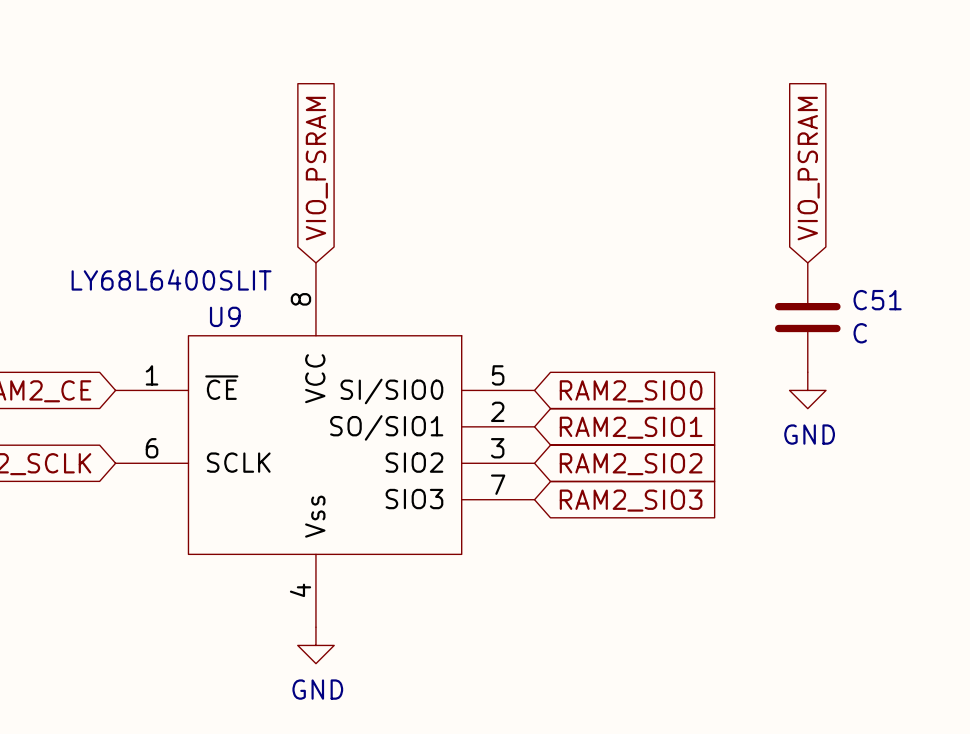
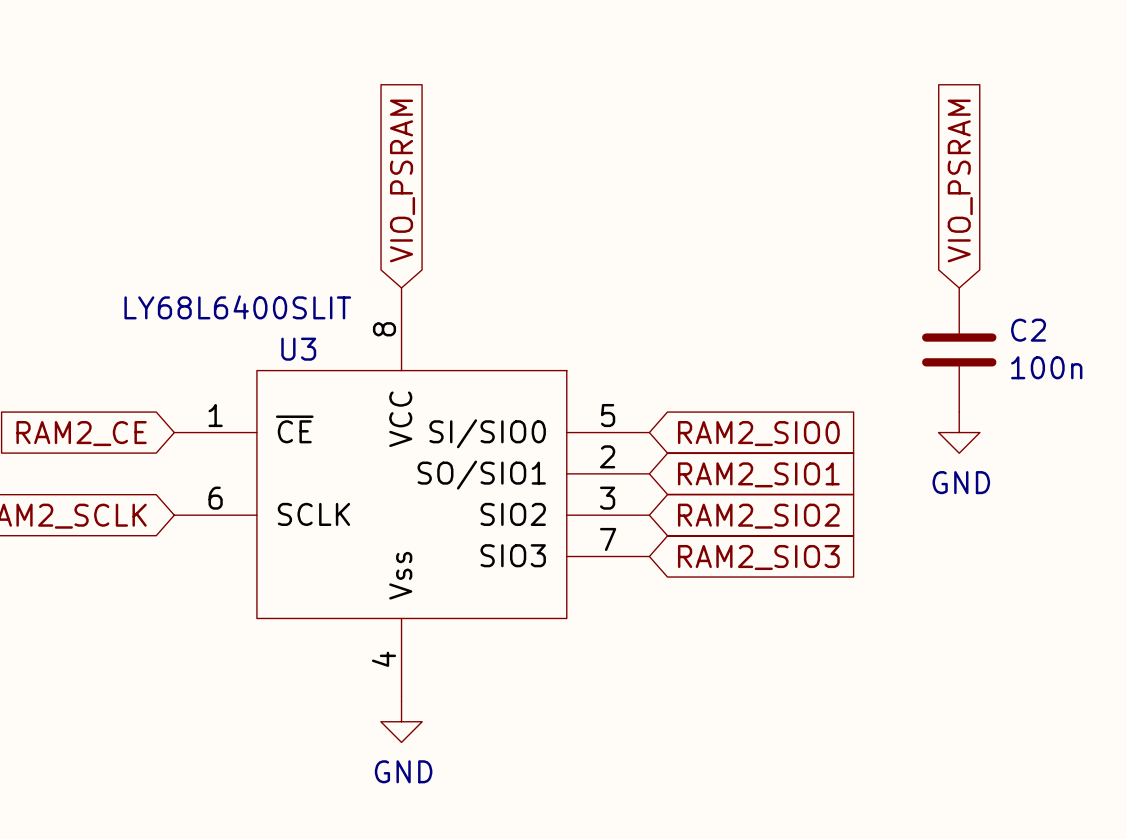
C51 name: C51 (877, 300) -> C2 (1028, 330)
U9 name: U9 (225, 316) -> U3 (298, 349)
C51 value: C (860, 333) -> 100n (1046, 367)

